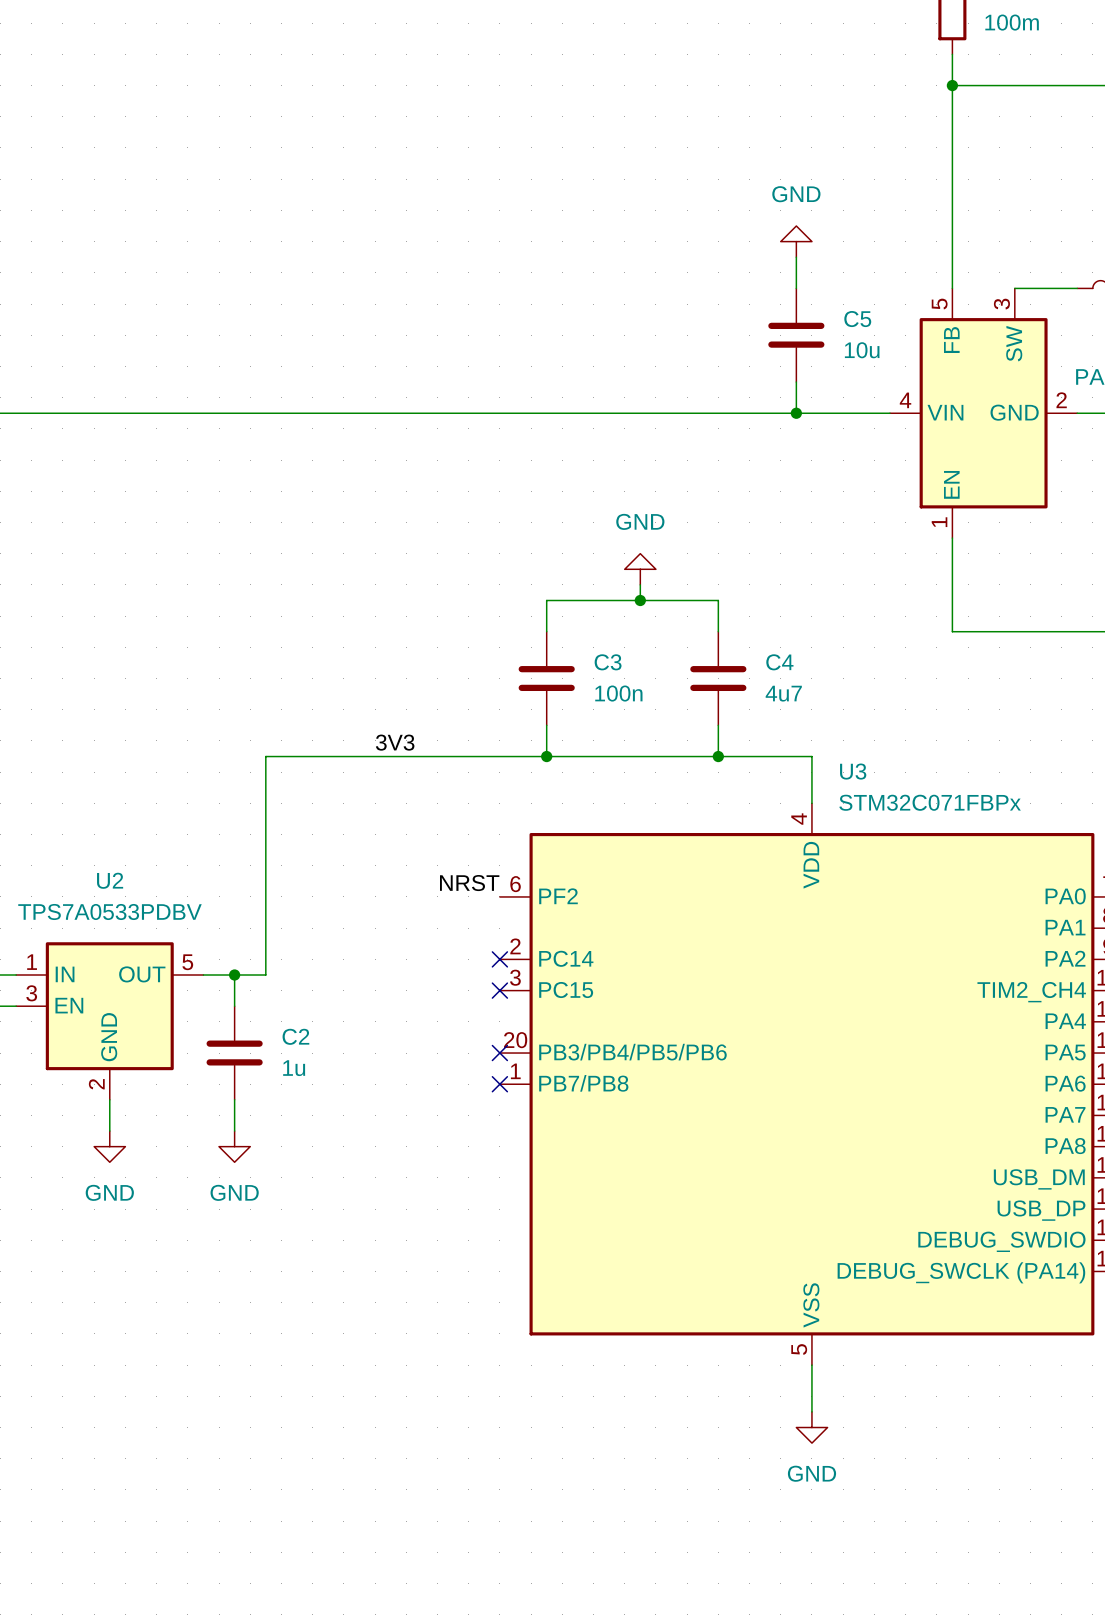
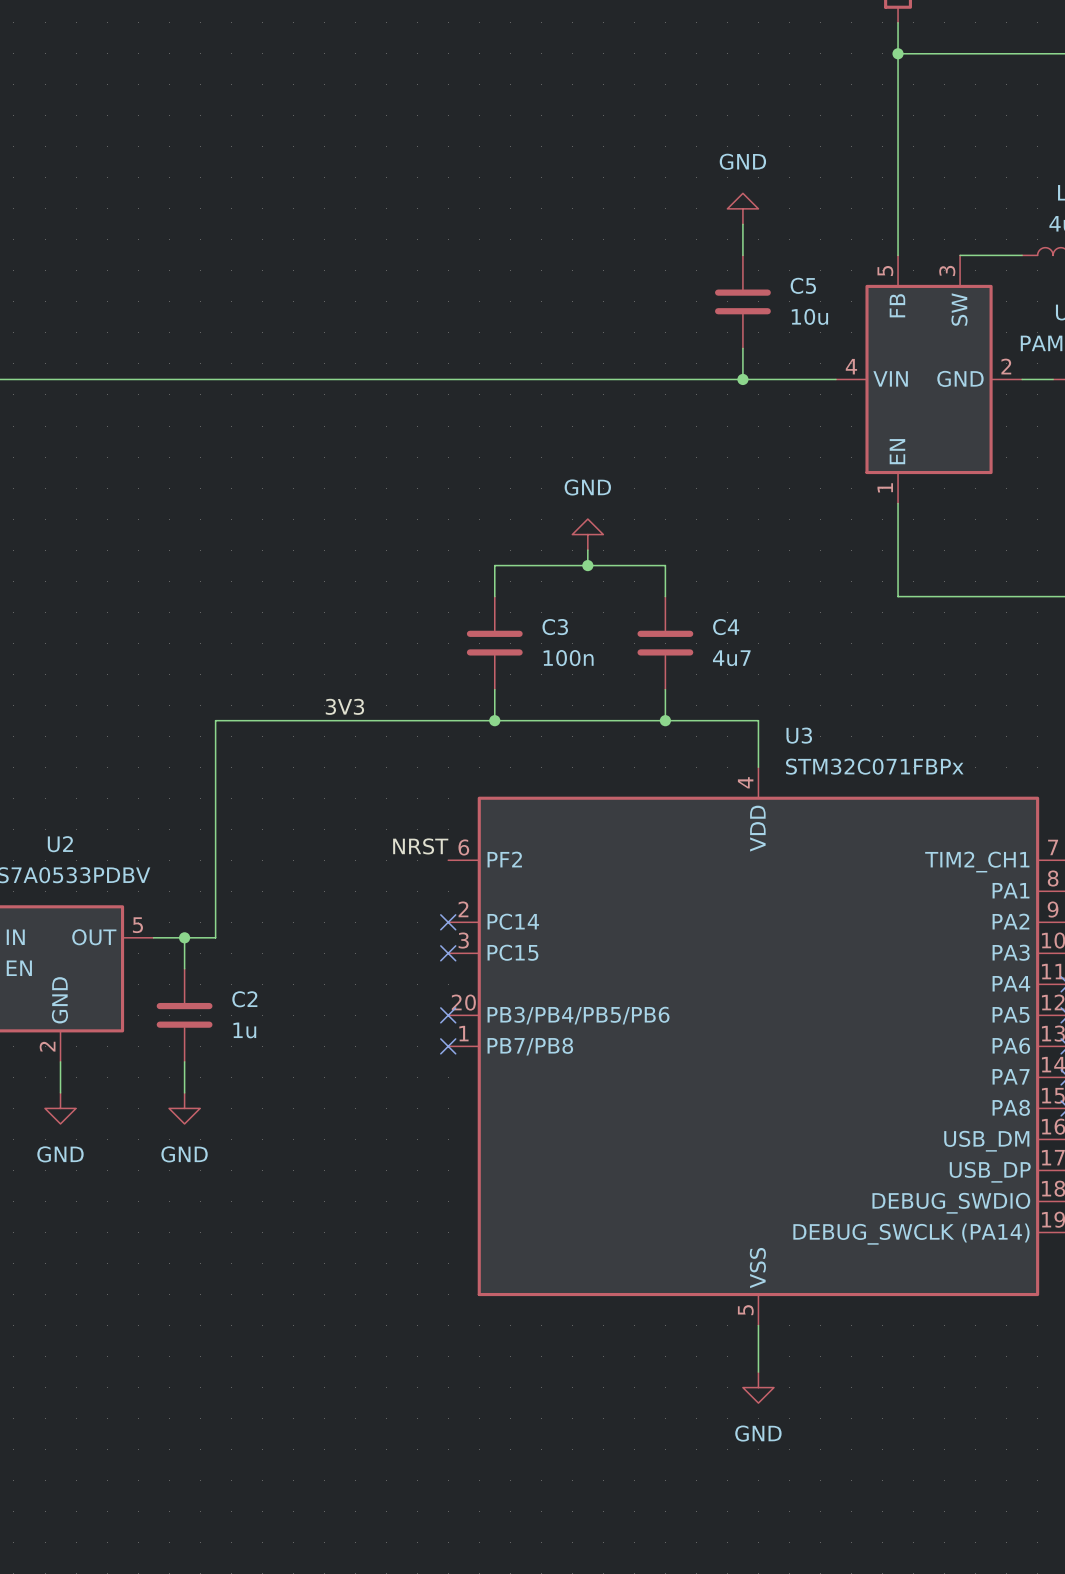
U3 pin name: PA0 (1065, 896) -> TIM2_CH1 (977, 862)
U3 pin name: TIM2_CH4 (1031, 992) -> PA3 (1011, 952)

